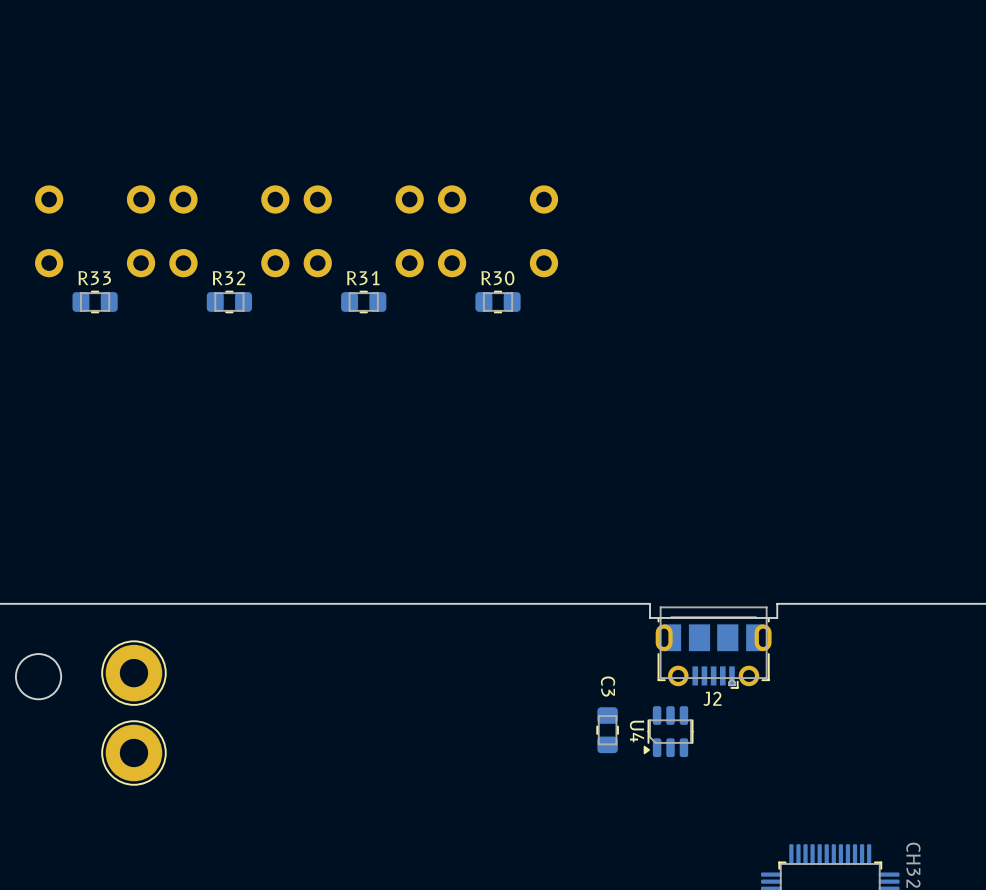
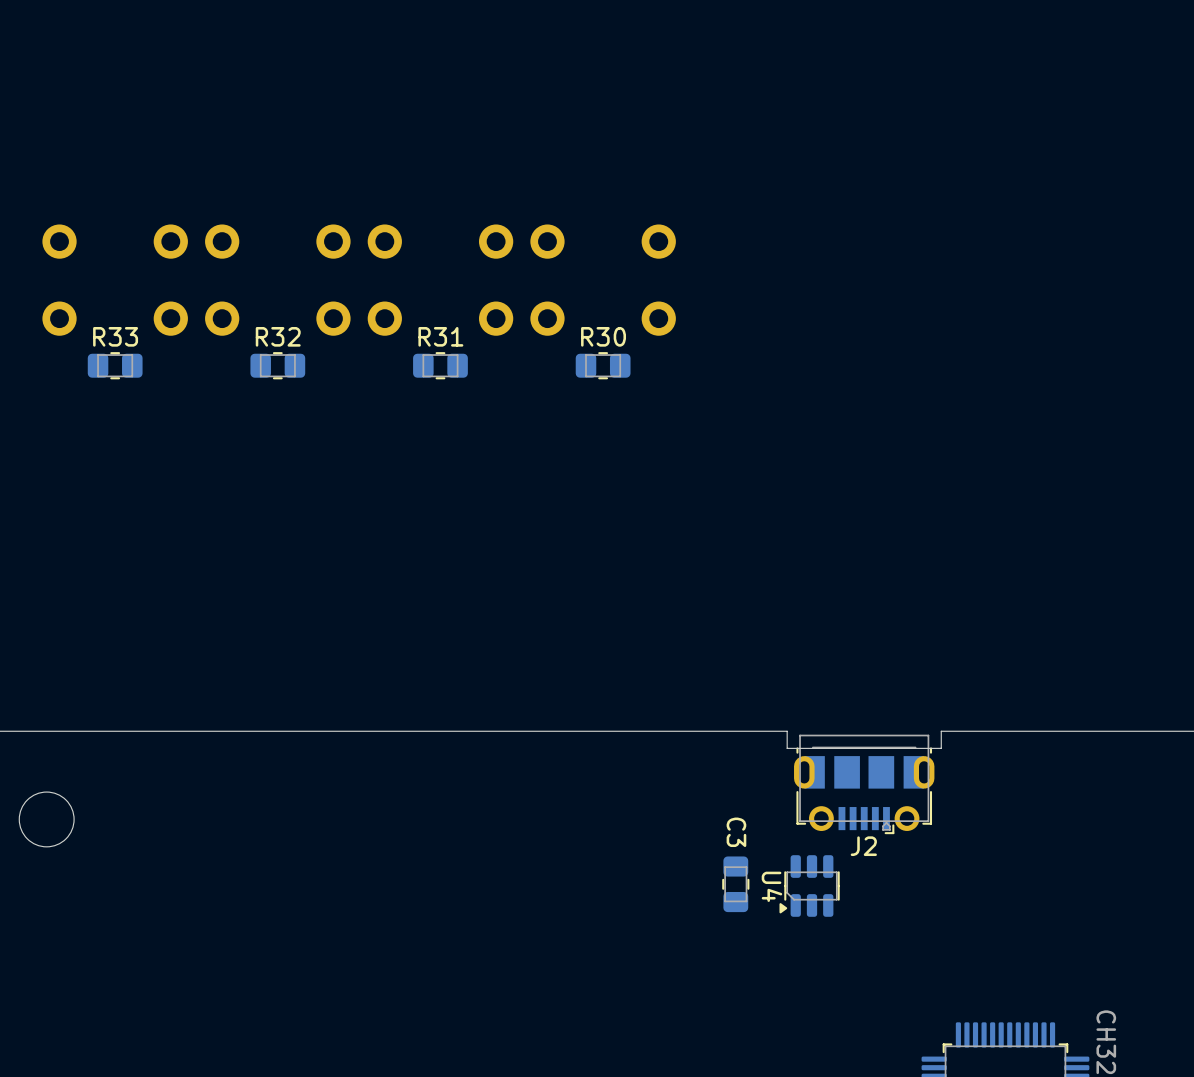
part: (133, 673) -> none
part: (133, 752) -> none

